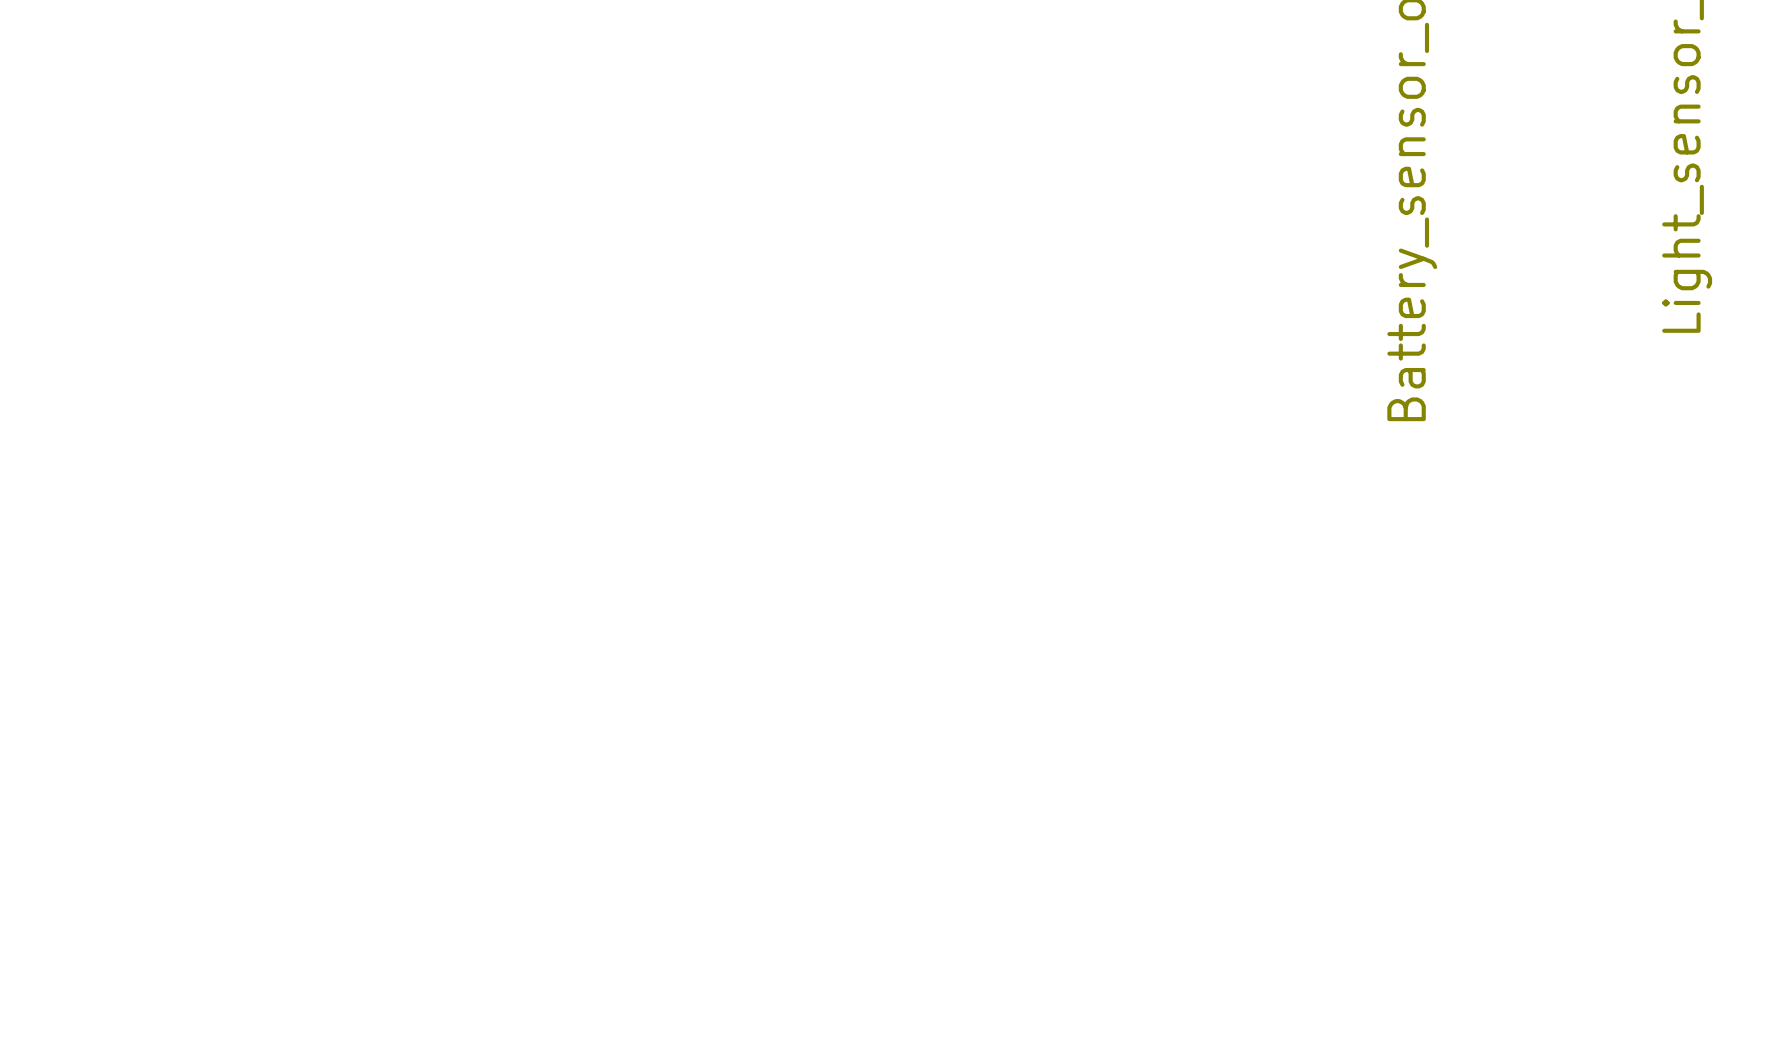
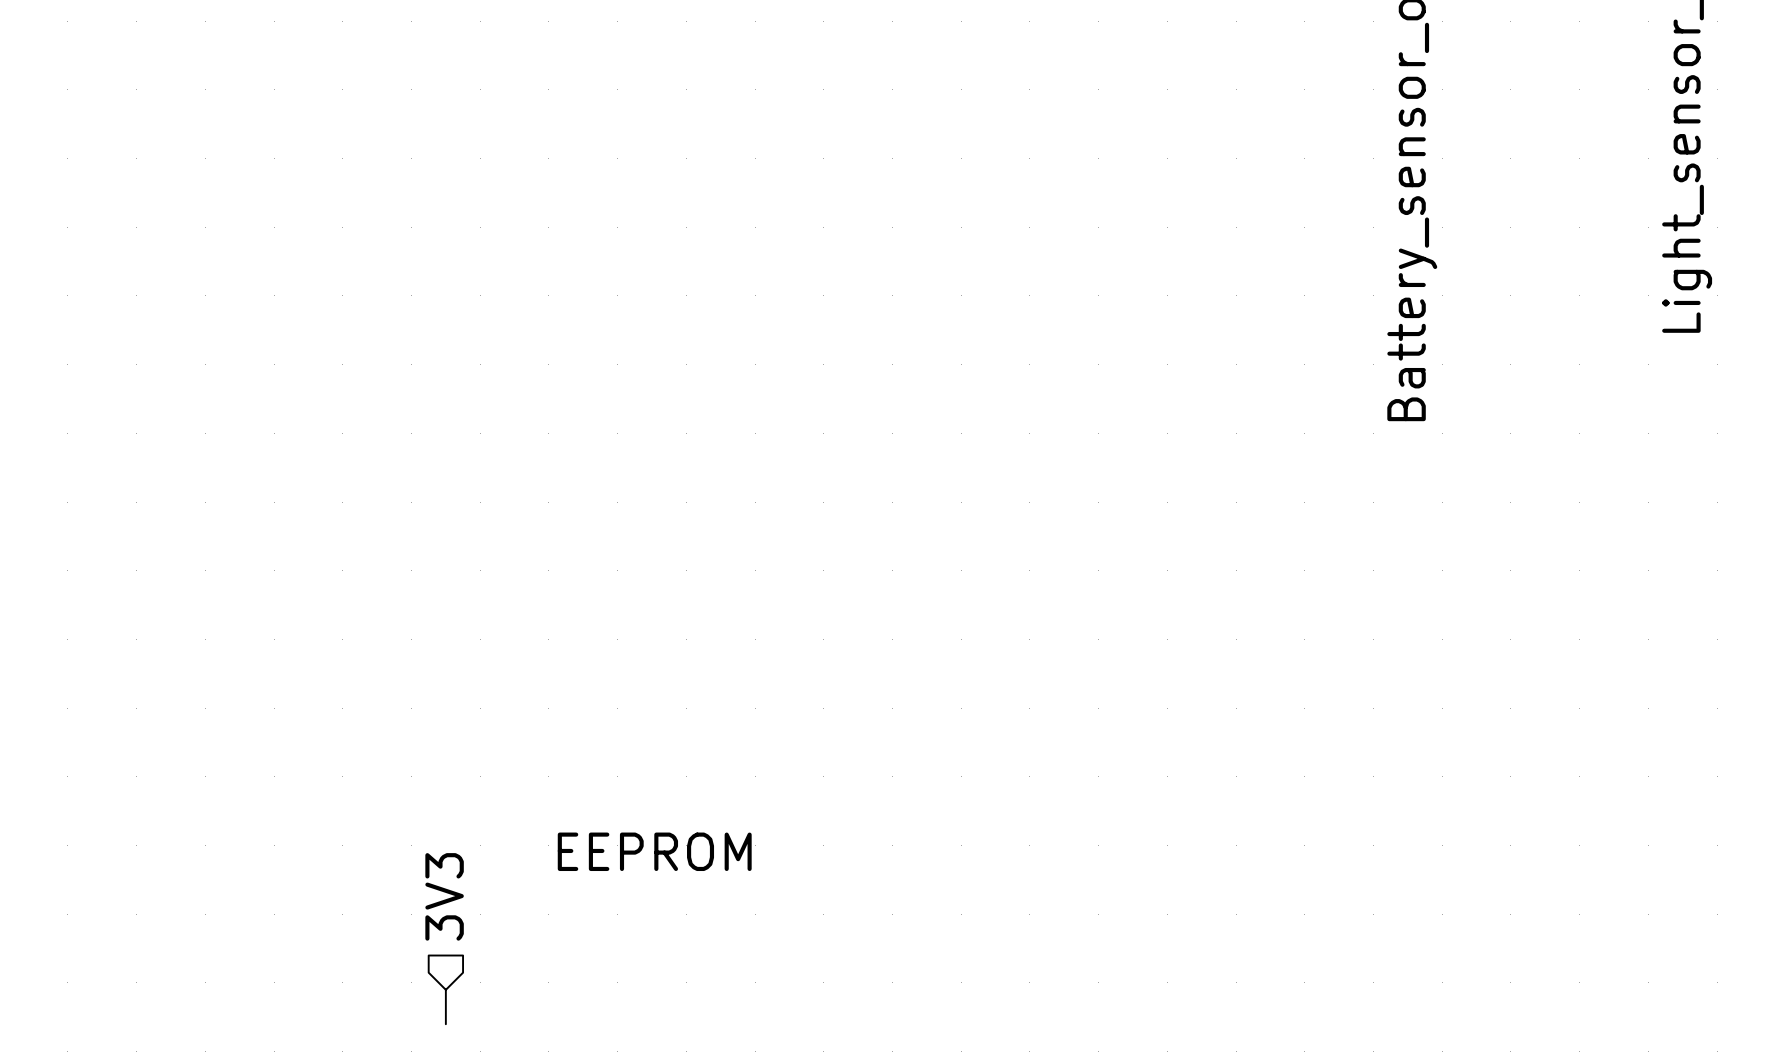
text: none -> EEPROM (654, 851)
hierarchical label: none -> 3V3 (444, 896)
wire: none -> (445, 989) (445, 1024)

